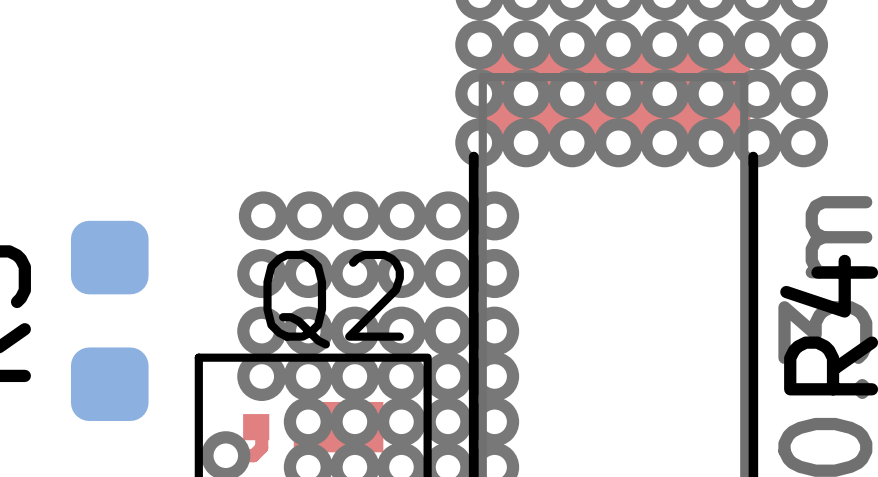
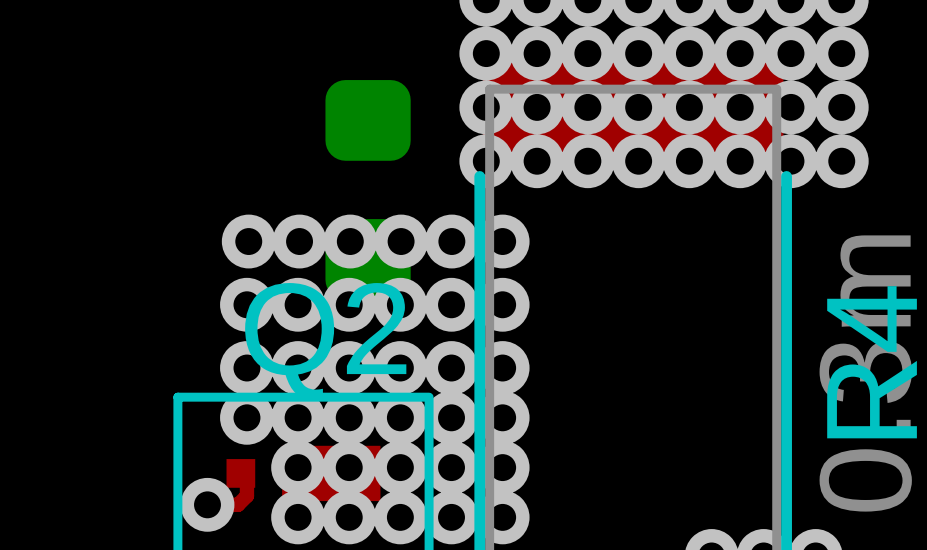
part position: (109, 320) -> (368, 189)

